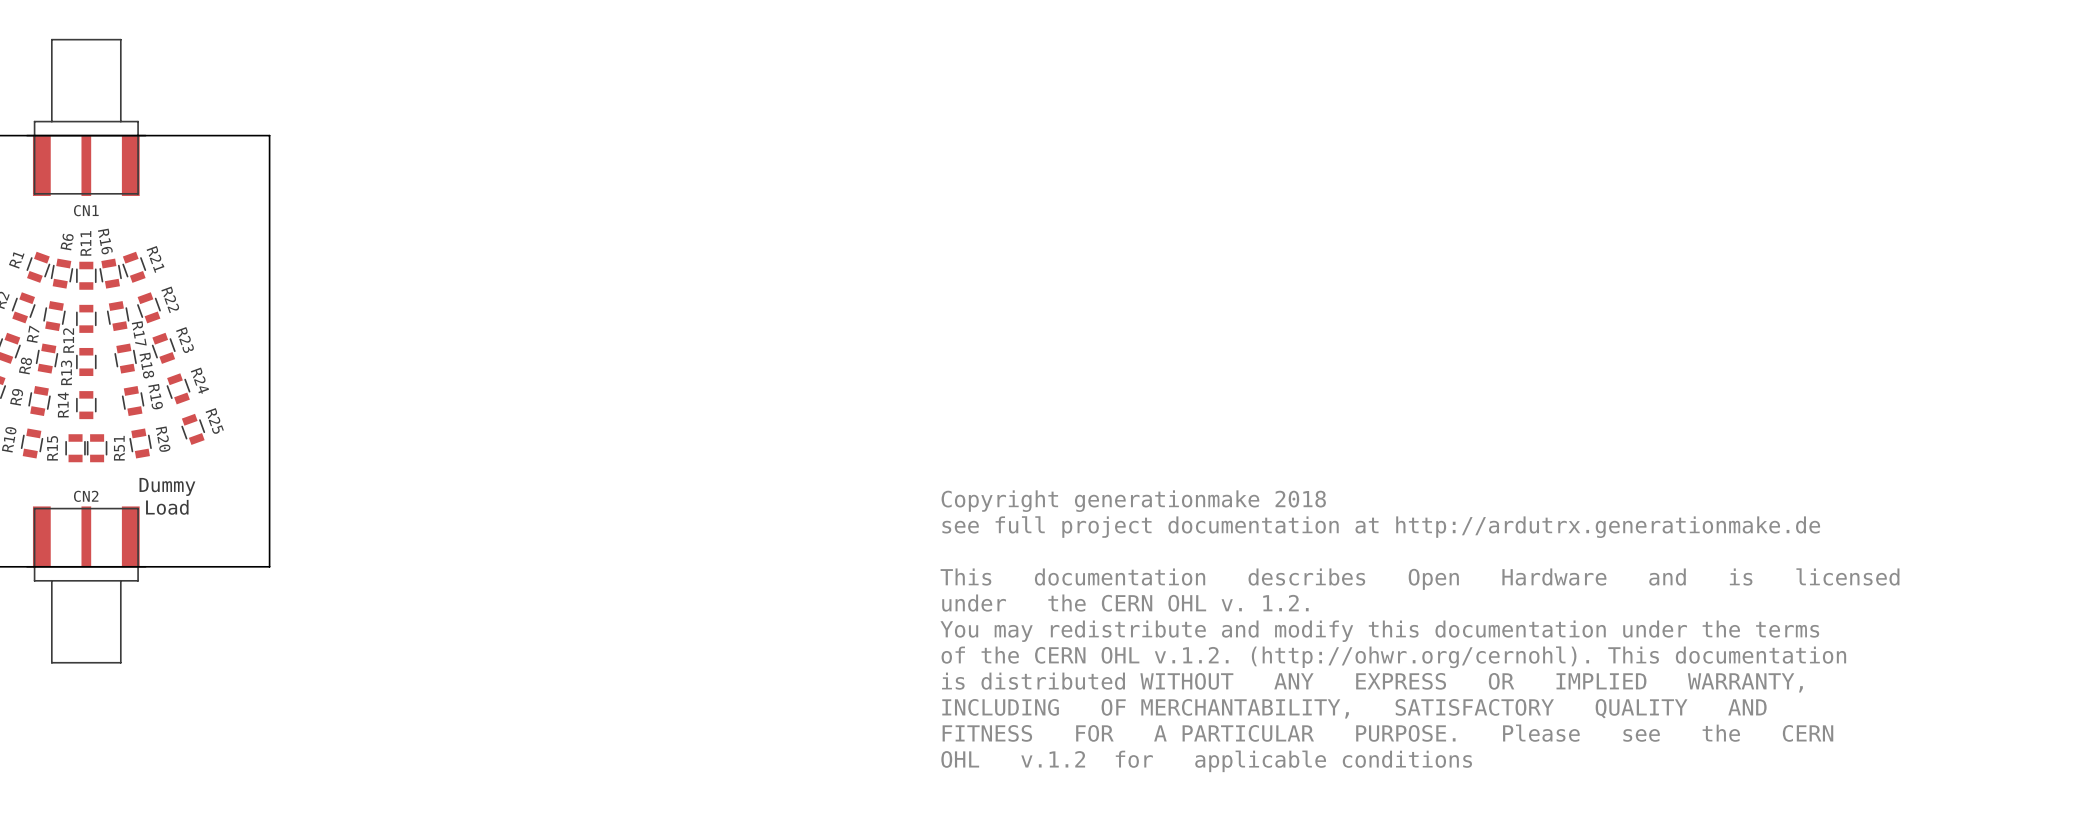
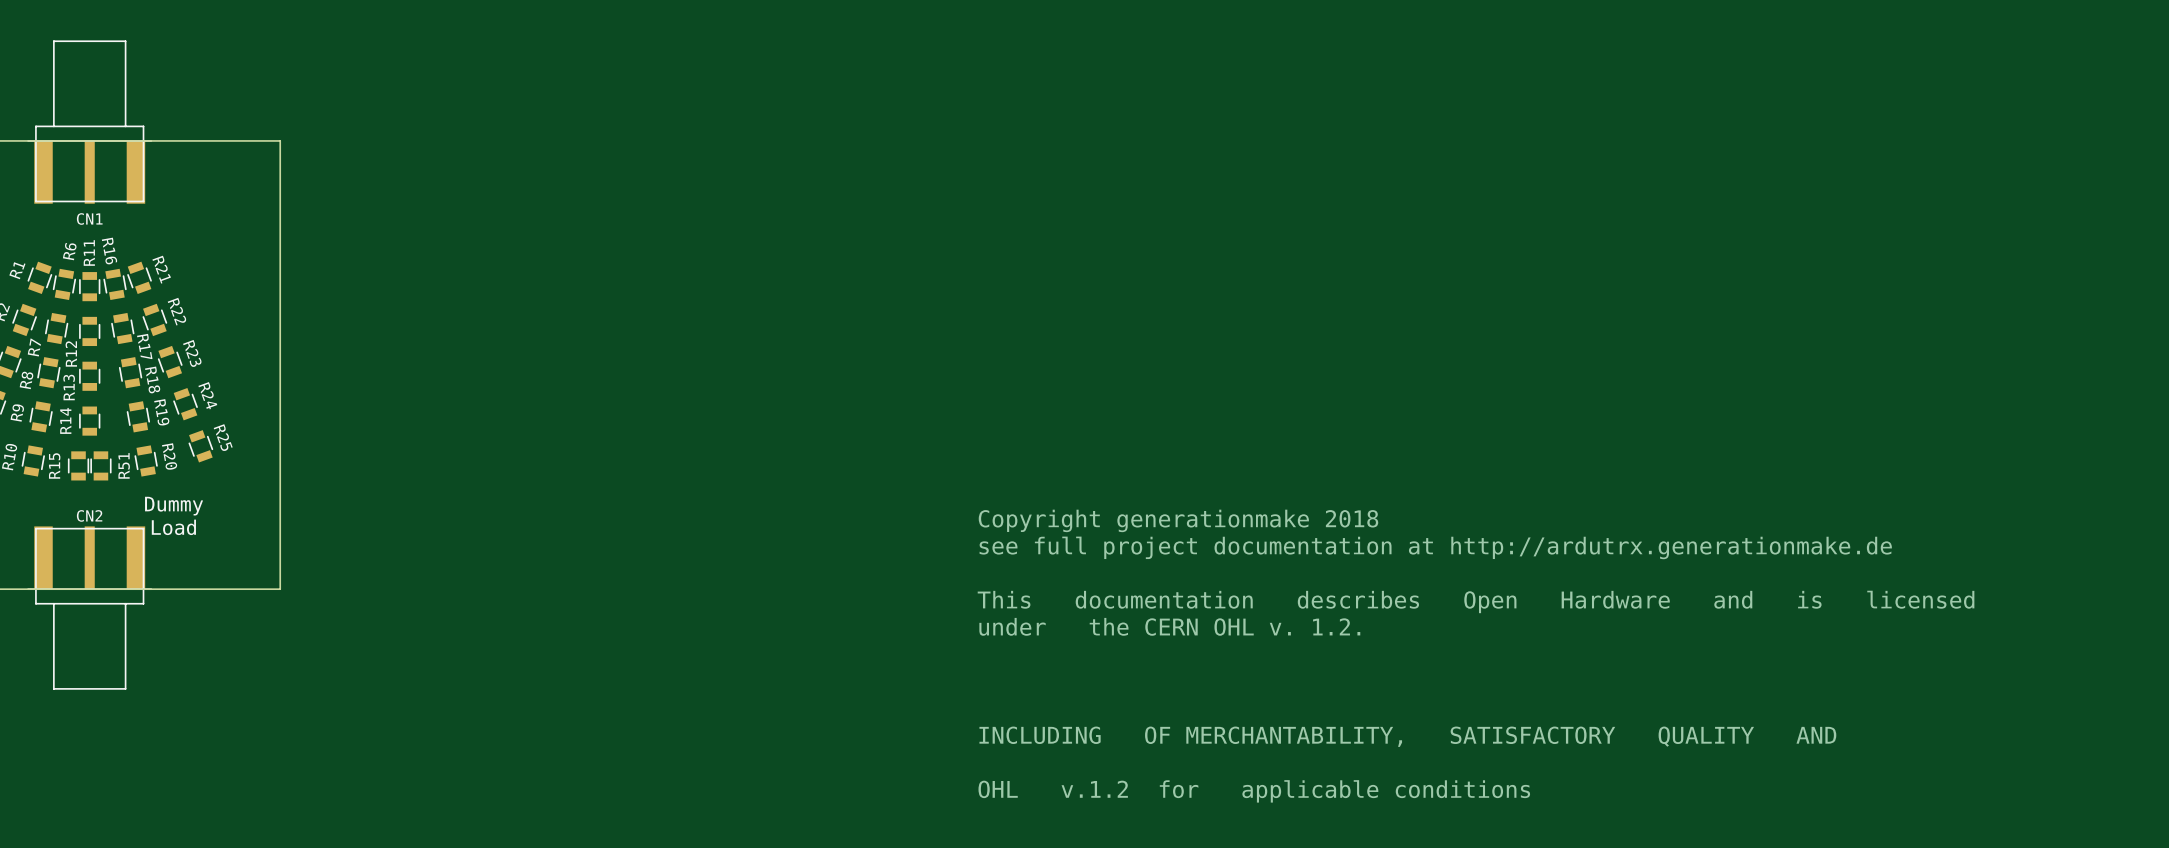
text: You may redistribute and modify this documentation under the terms (1379, 631) -> none
text: of the CERN OHL v.1.2. (http://ohwr.org/cernohl). This documentation (1393, 657) -> none
text: is distributed WITHOUT ANY EXPRESS OR IMPLIED WARRANTY, (1372, 682) -> none
text: FITNESS FOR A PARTICULAR PURPOSE. Please see the CERN (1387, 733) -> none

